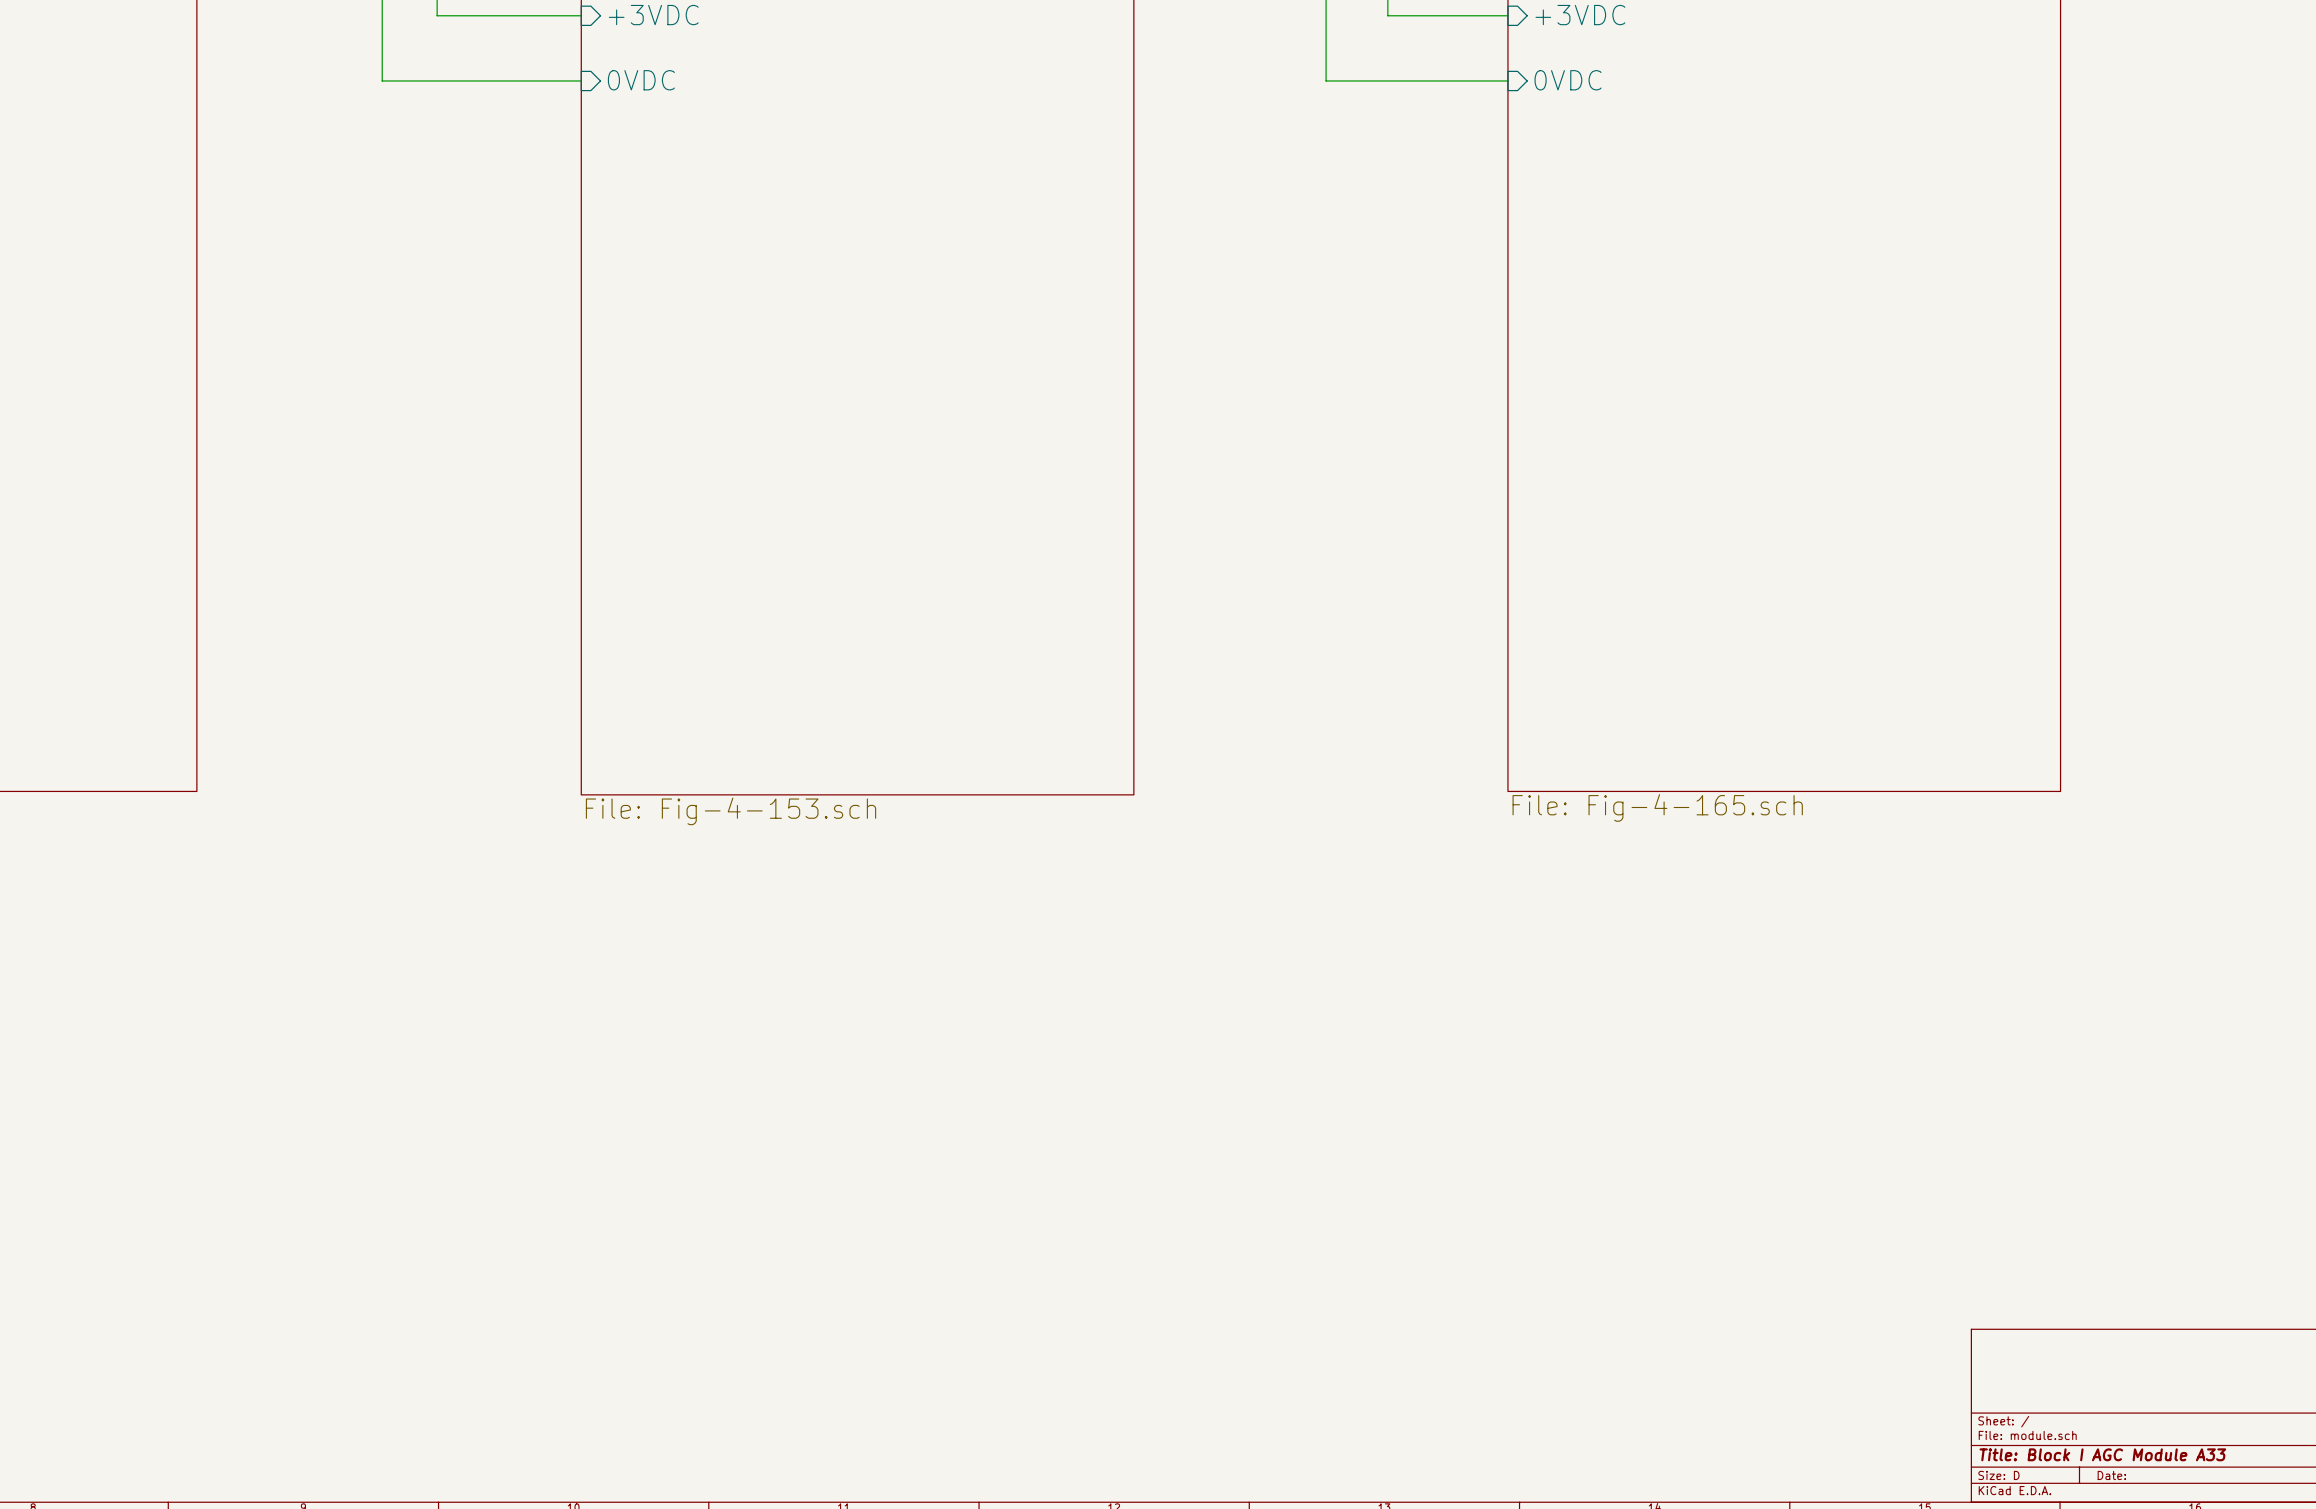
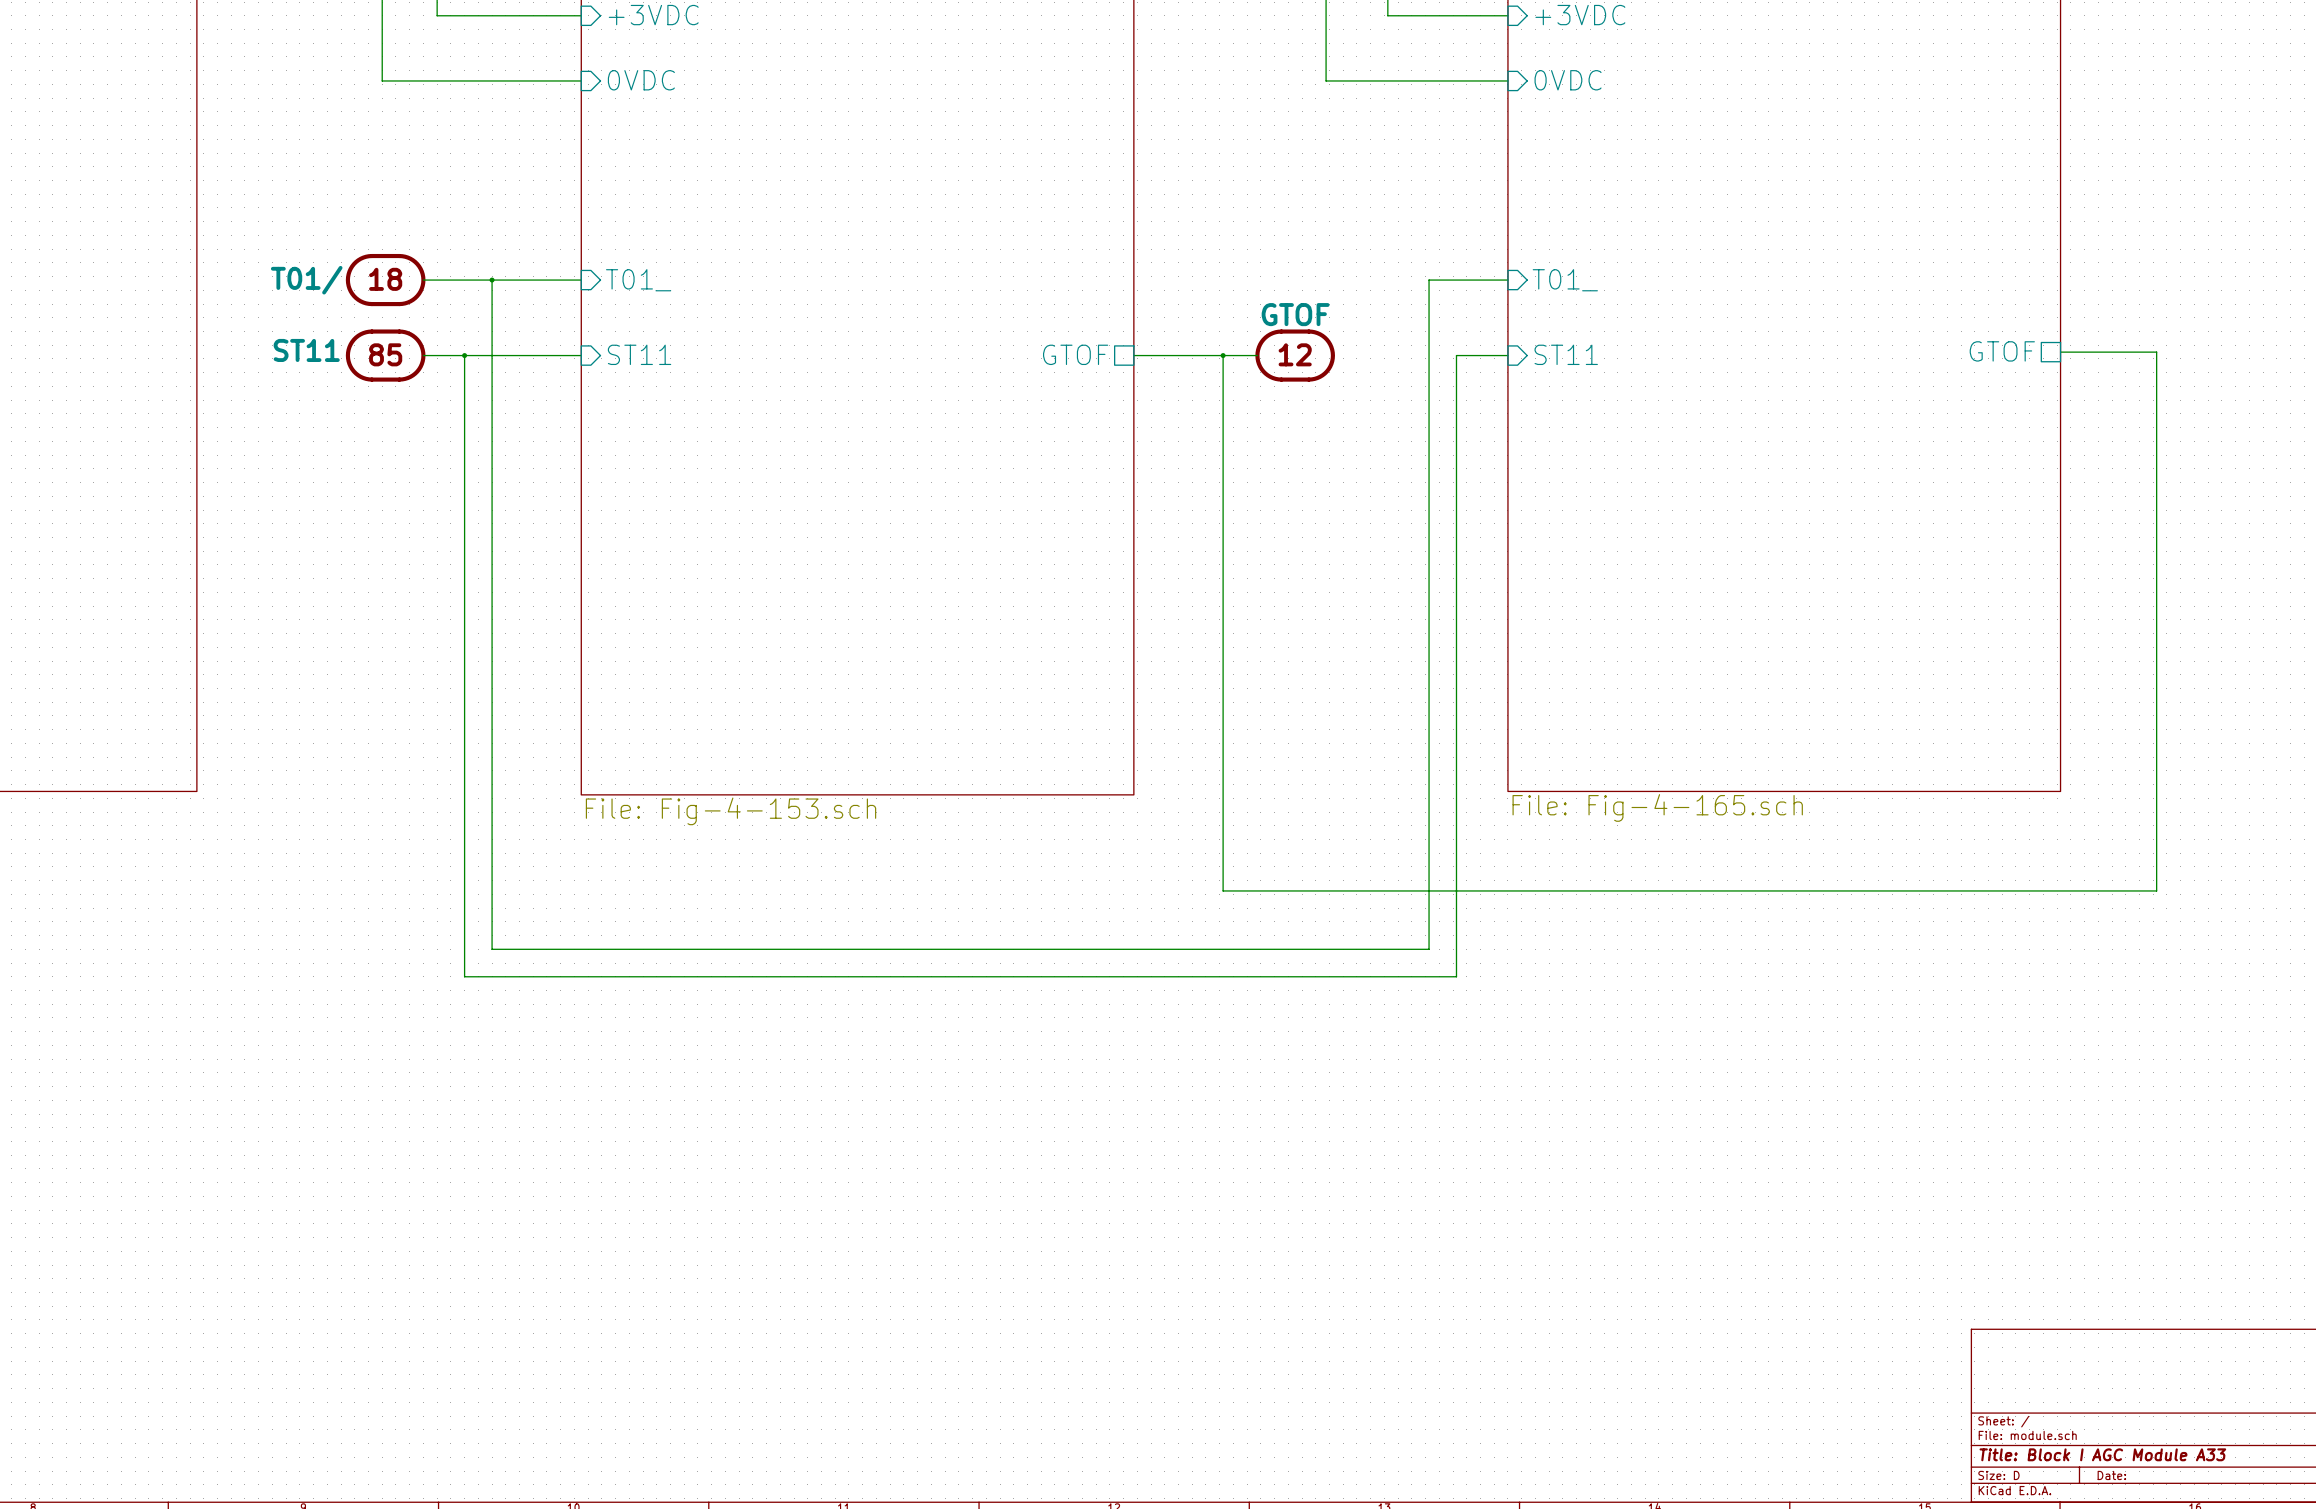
part: none -> (385, 280)
wire: none -> (423, 280) (581, 280)
wire: none -> (492, 280) (492, 949) (1429, 949) (1429, 280) (1507, 280)
junction: none -> (492, 280)
sheet pin: none -> T01_ (638, 280)
sheet pin: none -> T01_ (1565, 280)
sheet pin: none -> GTOF (2002, 351)
wire: none -> (2060, 352) (2156, 352) (2156, 890) (1223, 890) (1223, 355)
sheet pin: none -> ST11 (639, 354)
sheet pin: none -> GTOF (1075, 354)
sheet pin: none -> ST11 (1566, 354)
part: none -> (385, 355)
wire: none -> (423, 355) (581, 355)
wire: none -> (464, 355) (464, 976) (1456, 976) (1456, 355) (1507, 355)
junction: none -> (464, 355)
wire: none -> (1133, 355) (1257, 355)
junction: none -> (1223, 355)
part: none -> (1295, 355)

